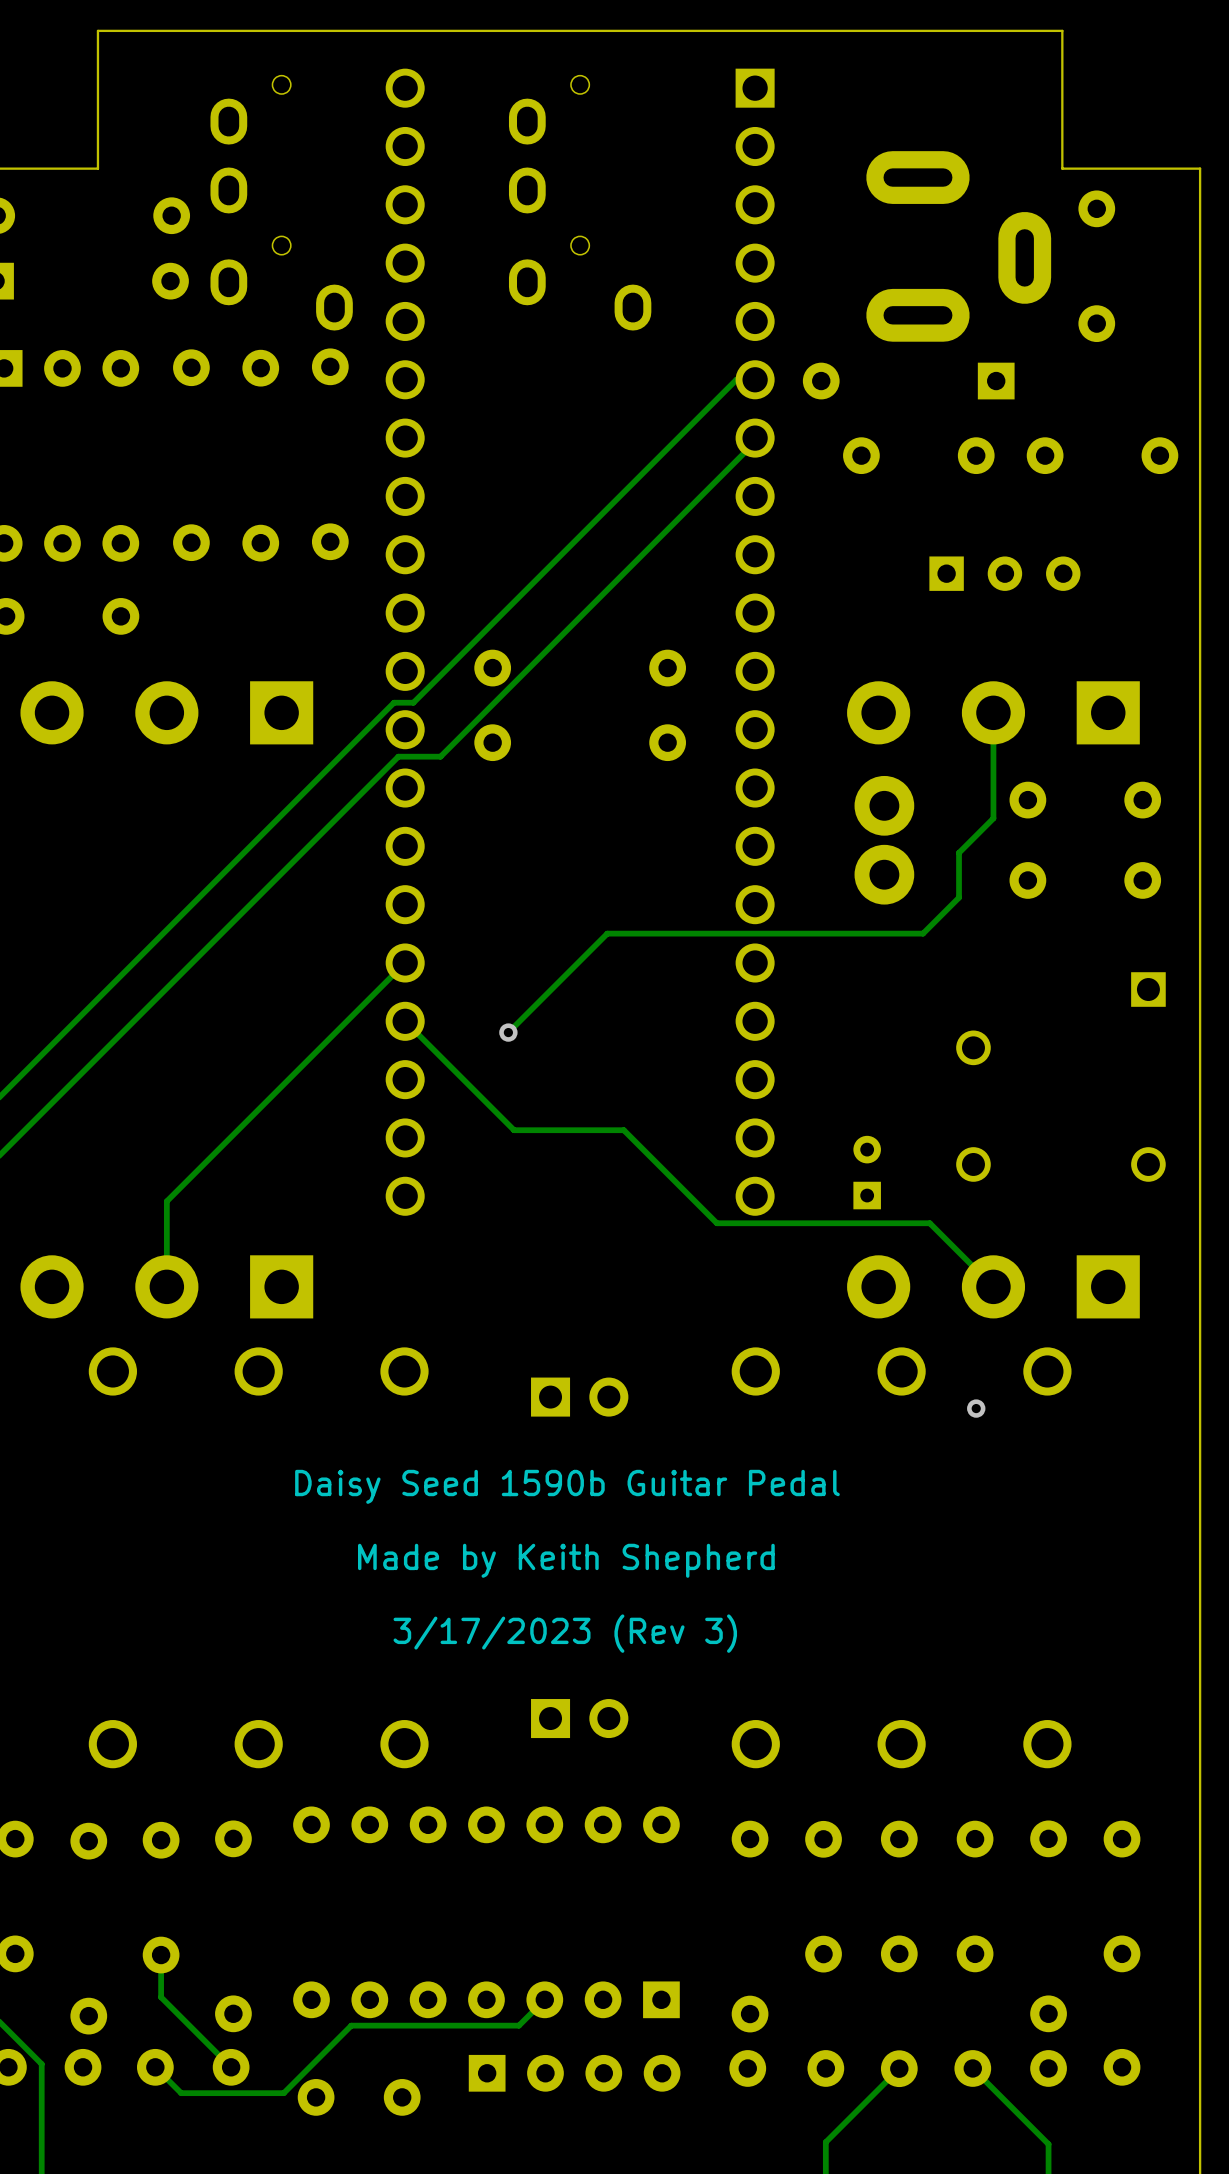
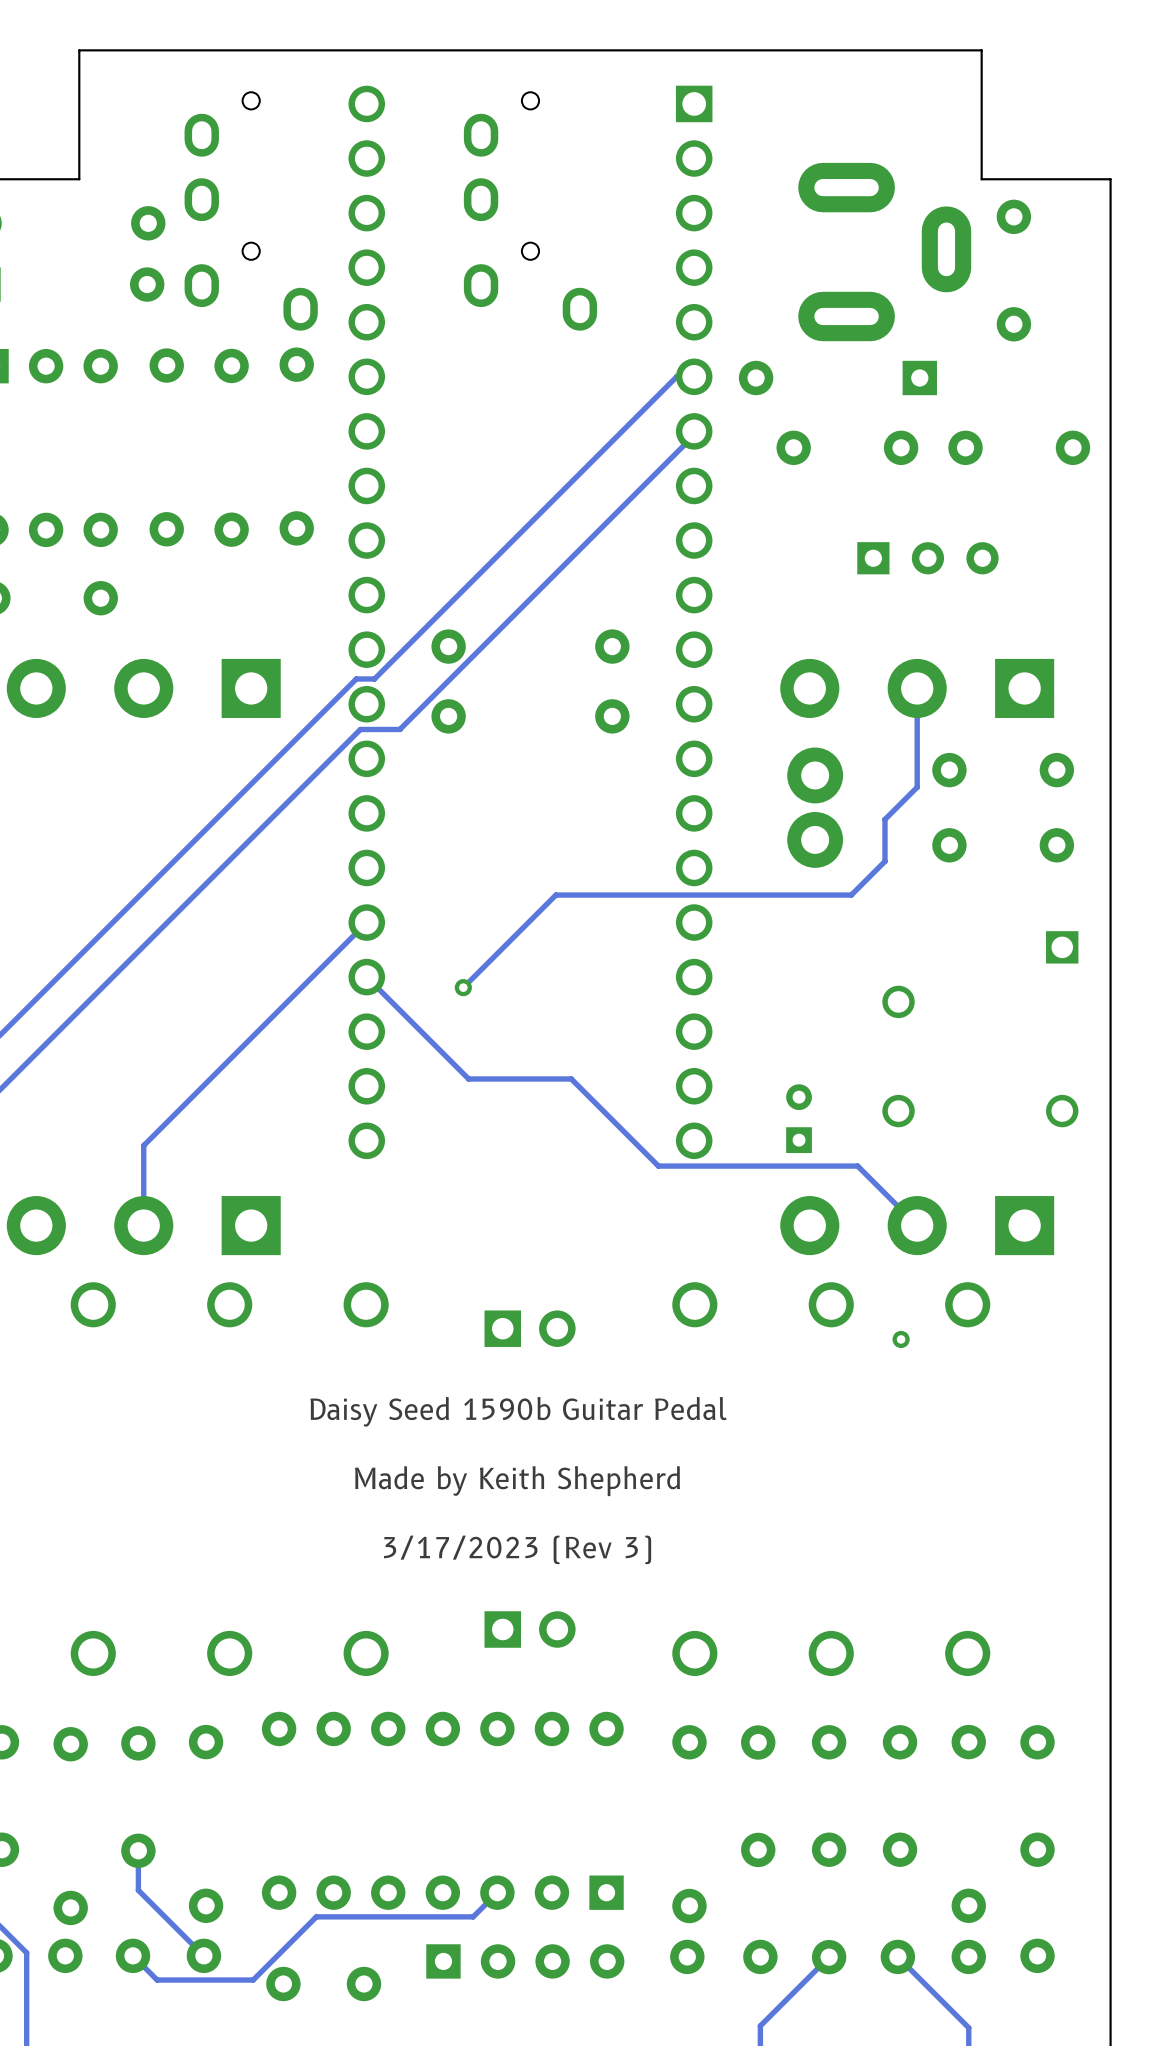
part footprint: [866, 151, 1052, 342] -> [798, 162, 972, 342]

